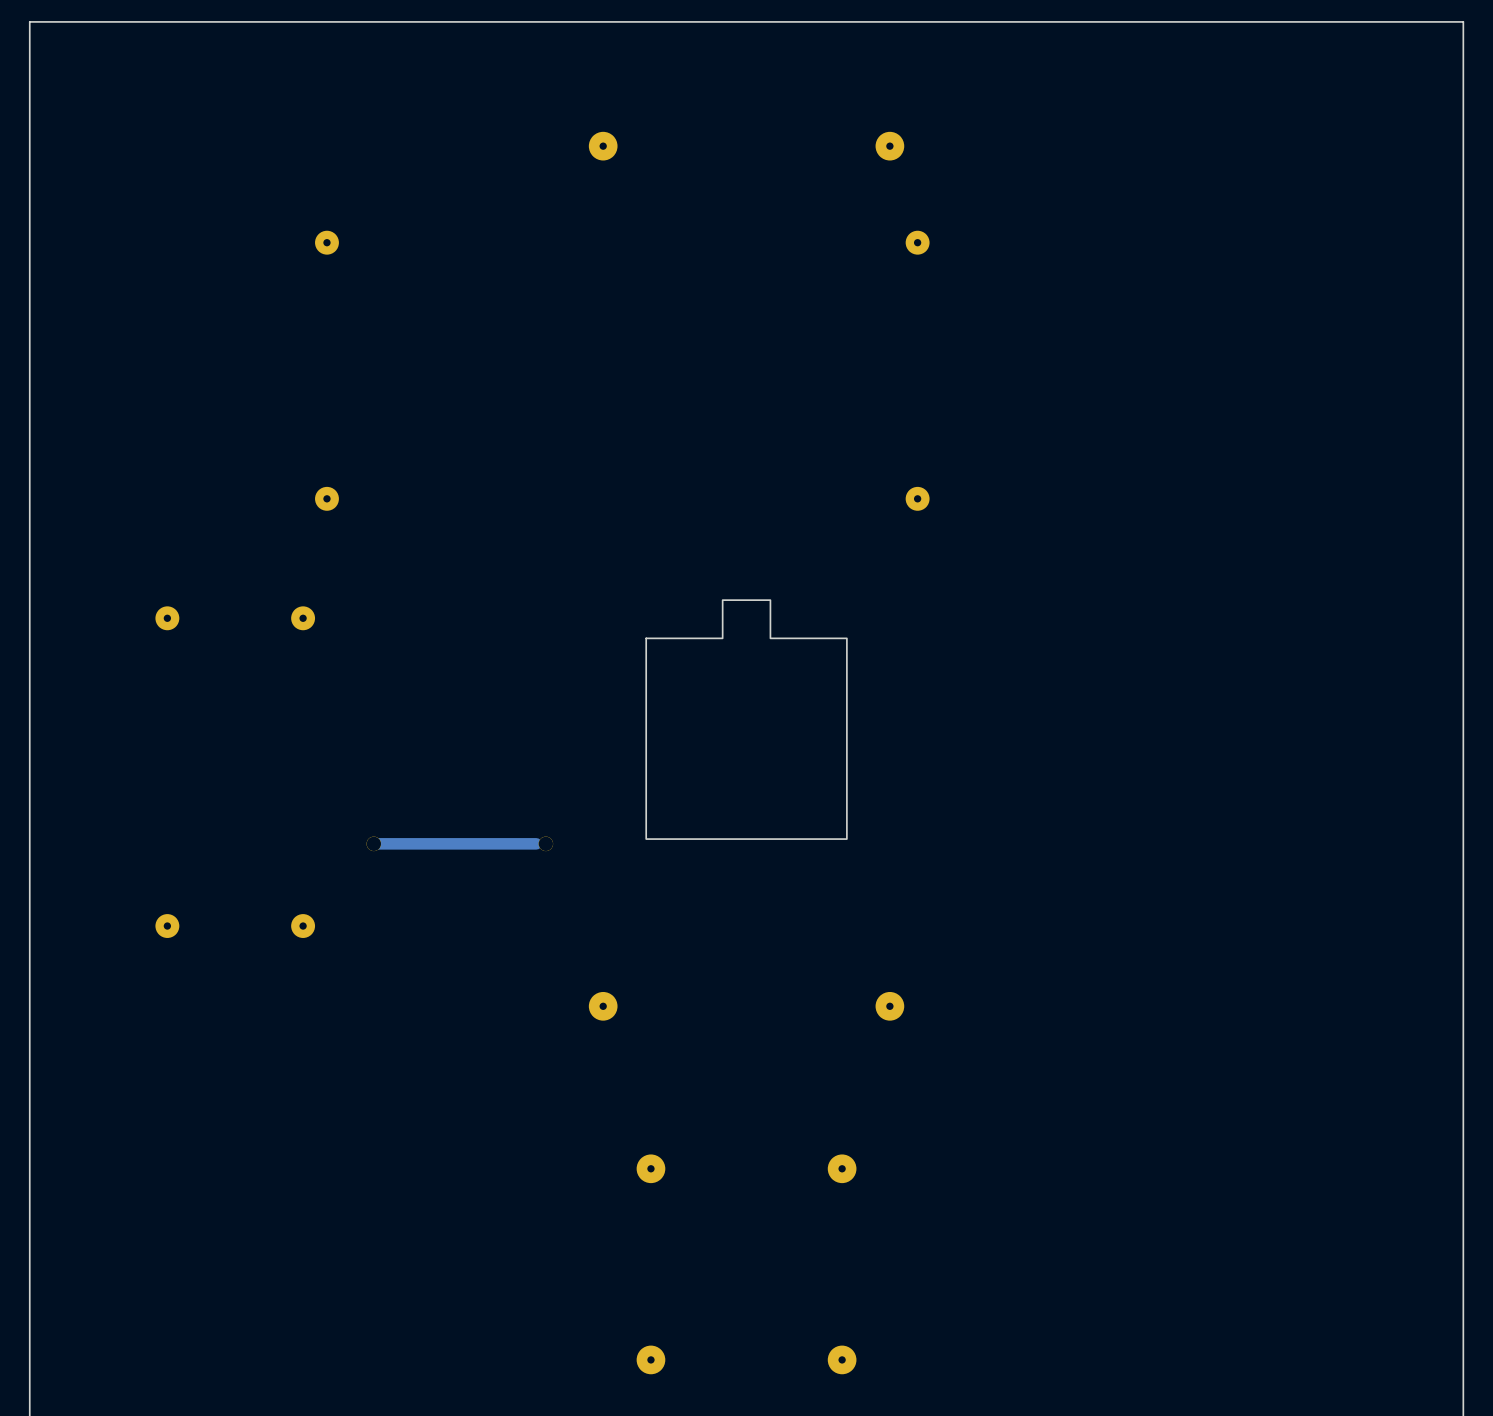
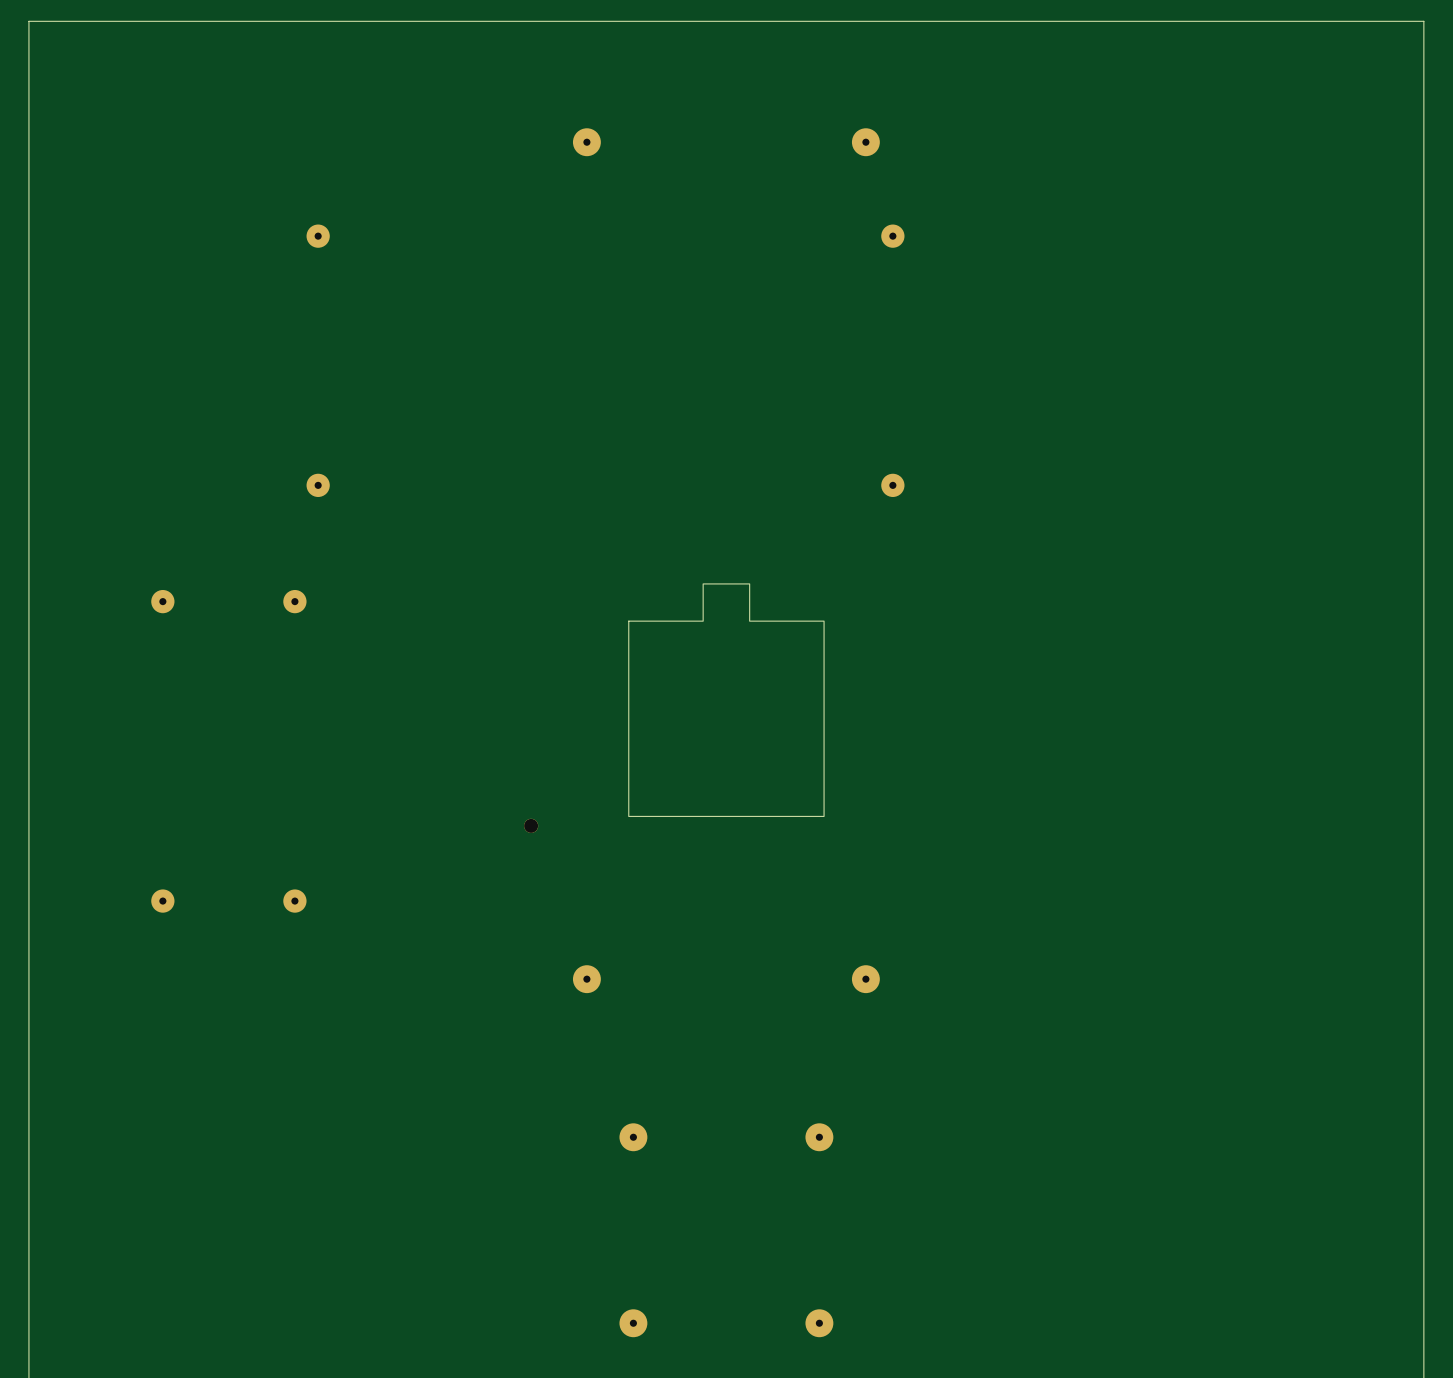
part: (459, 843) -> none
part: none -> (531, 825)

